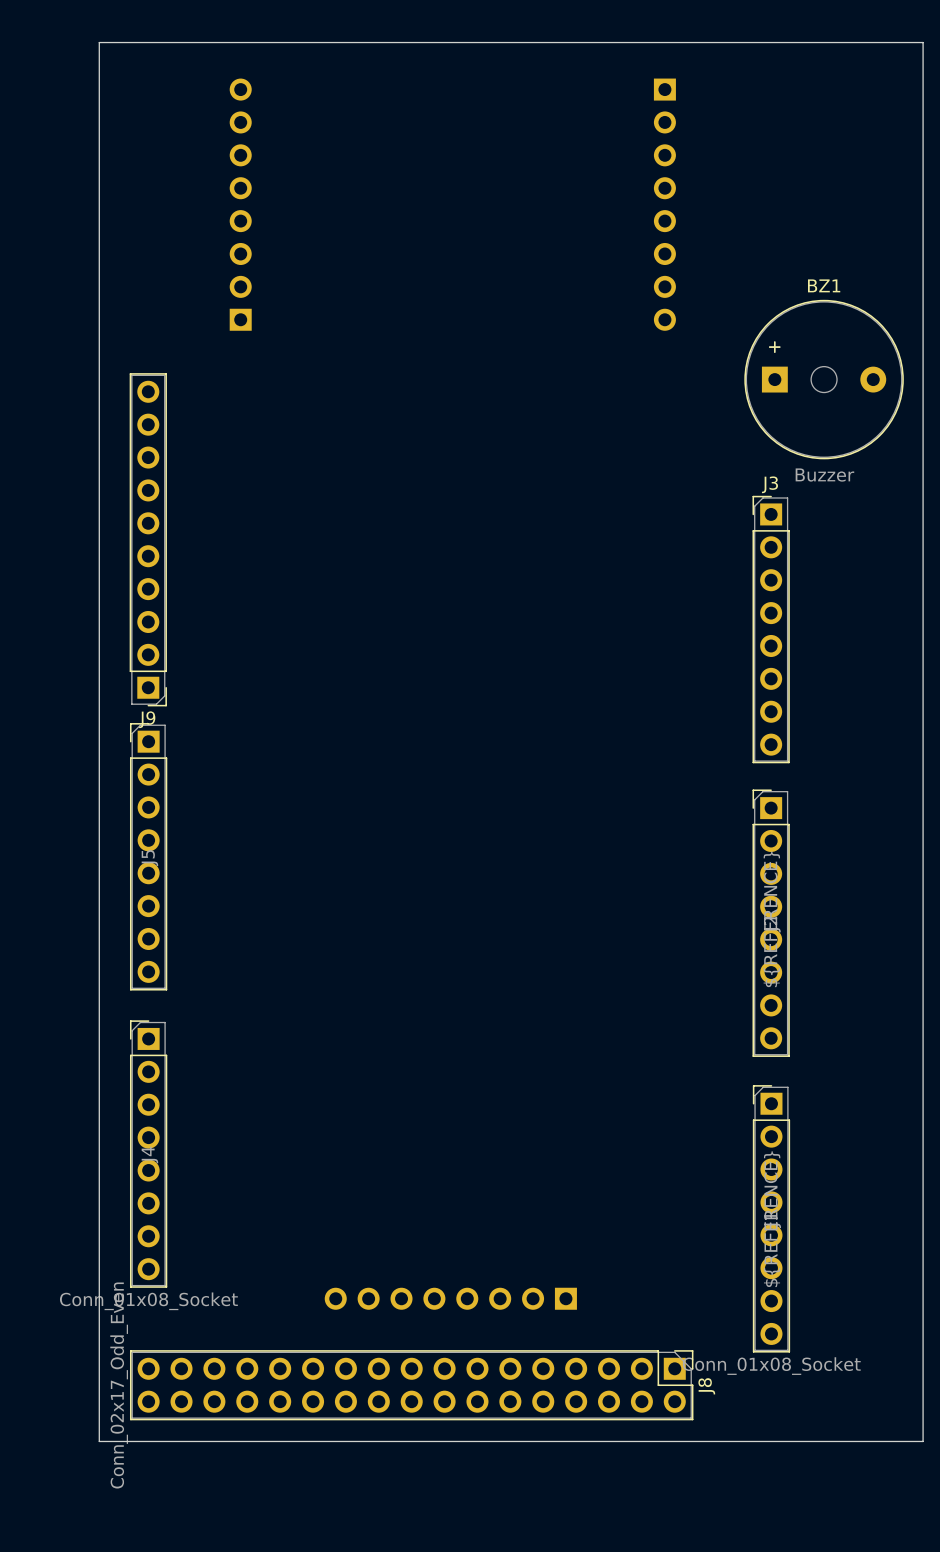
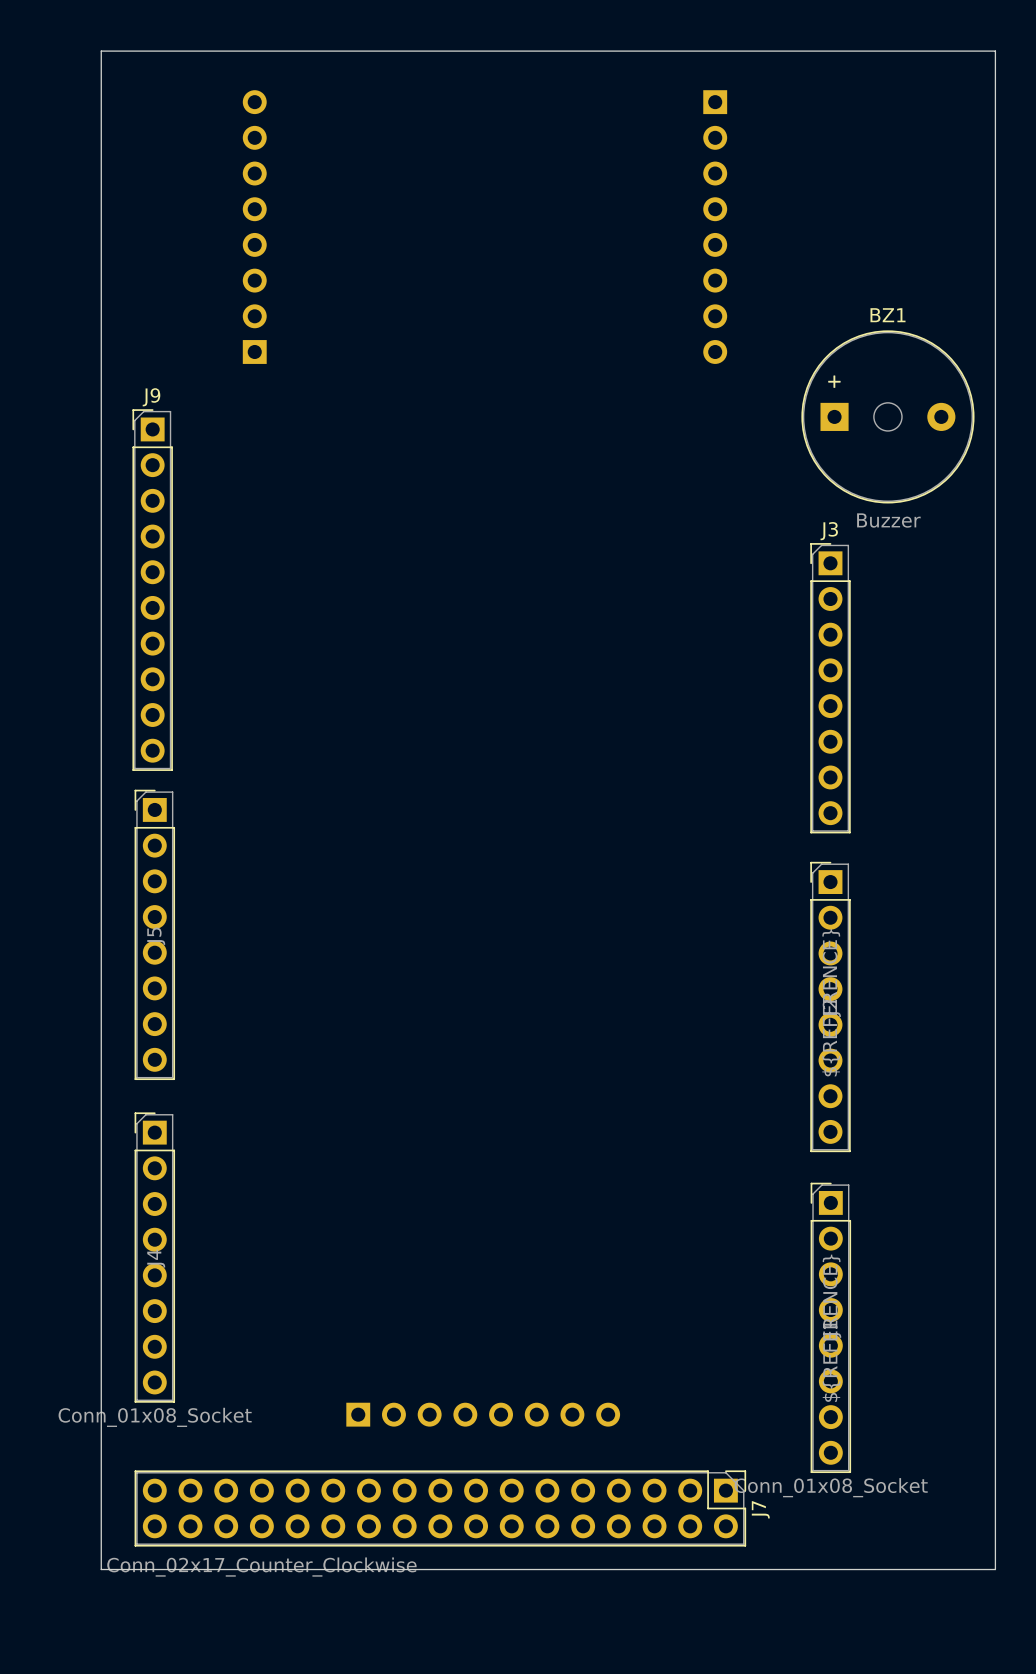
J9 rotation: 0° (148, 539) -> 180° (152, 590)
part rotation: 0° (450, 1298) -> 180° (483, 1414)
J8 value: Conn_02x17_Odd_Even (119, 1385) -> Conn_02x17_Counter_Clockwise (261, 1567)
J8 name: J8 (706, 1386) -> J7 (760, 1509)

